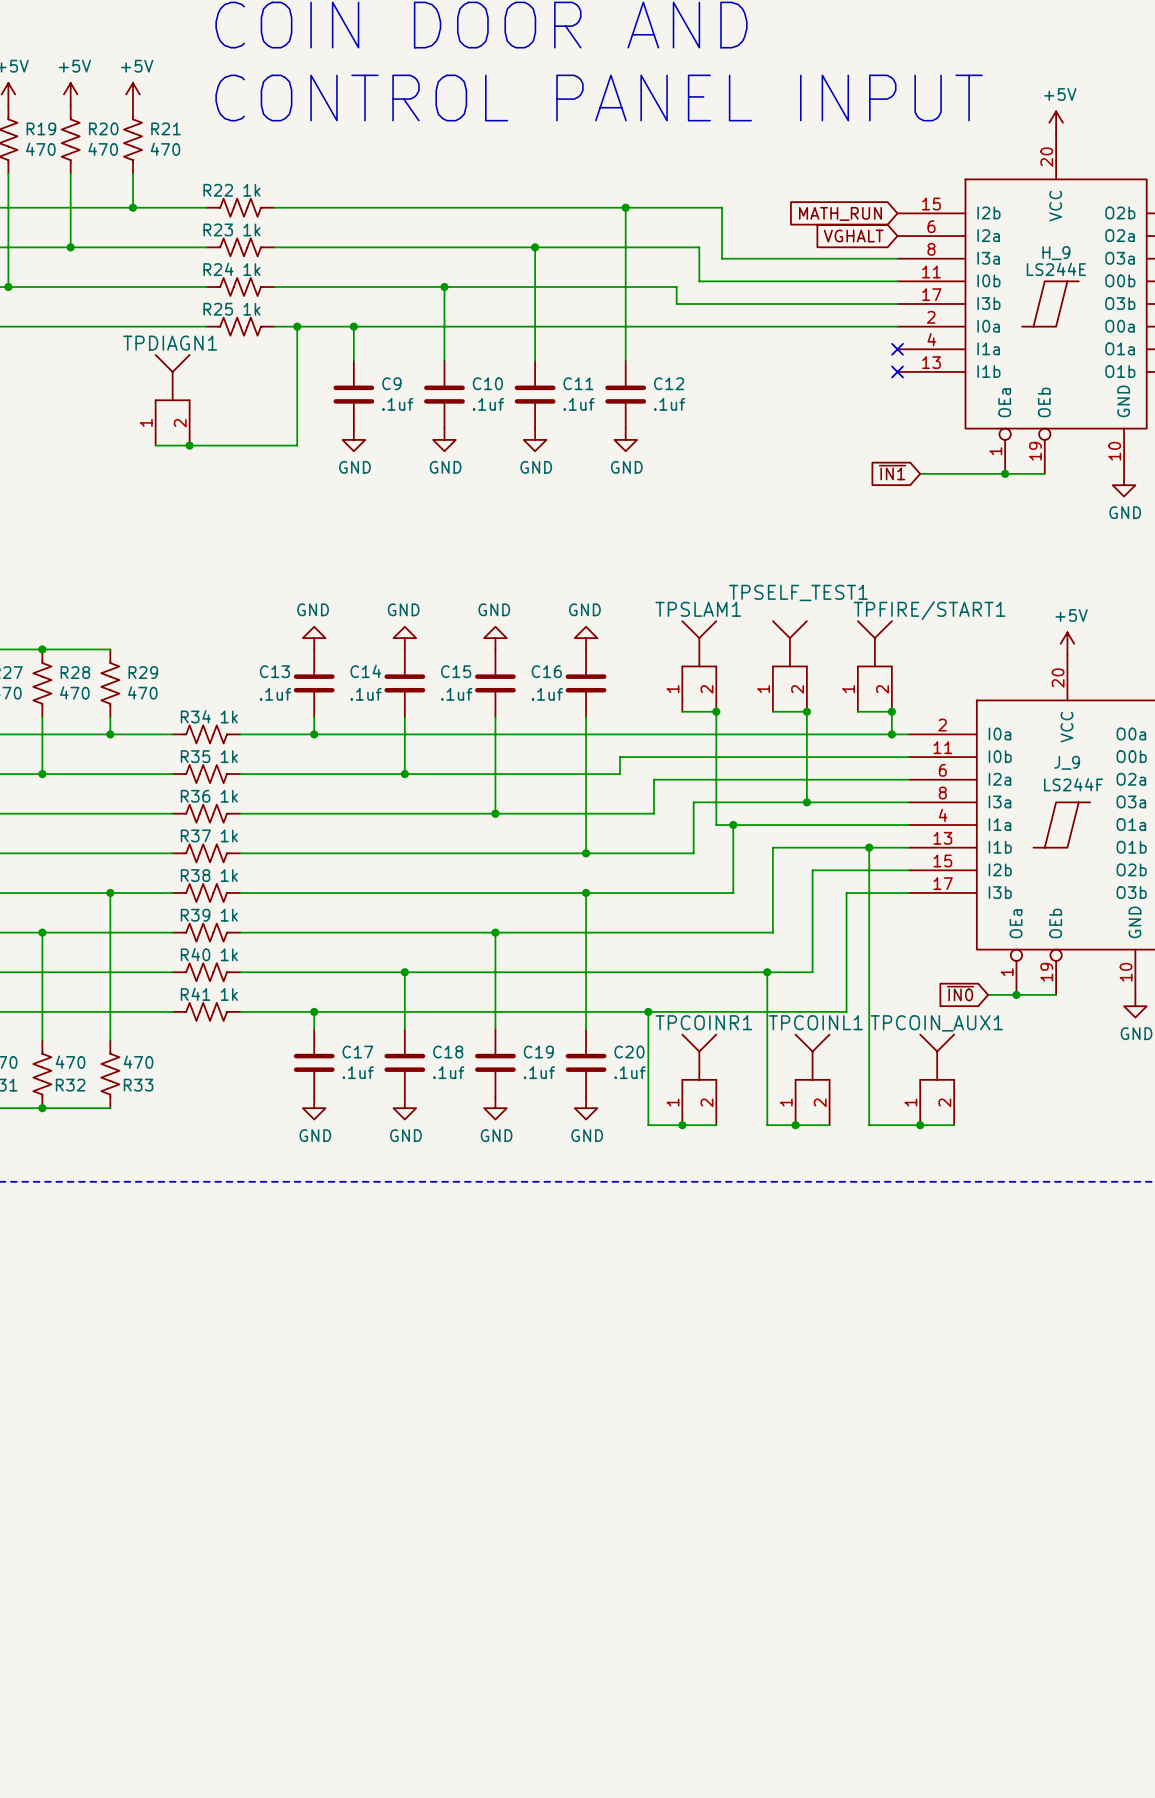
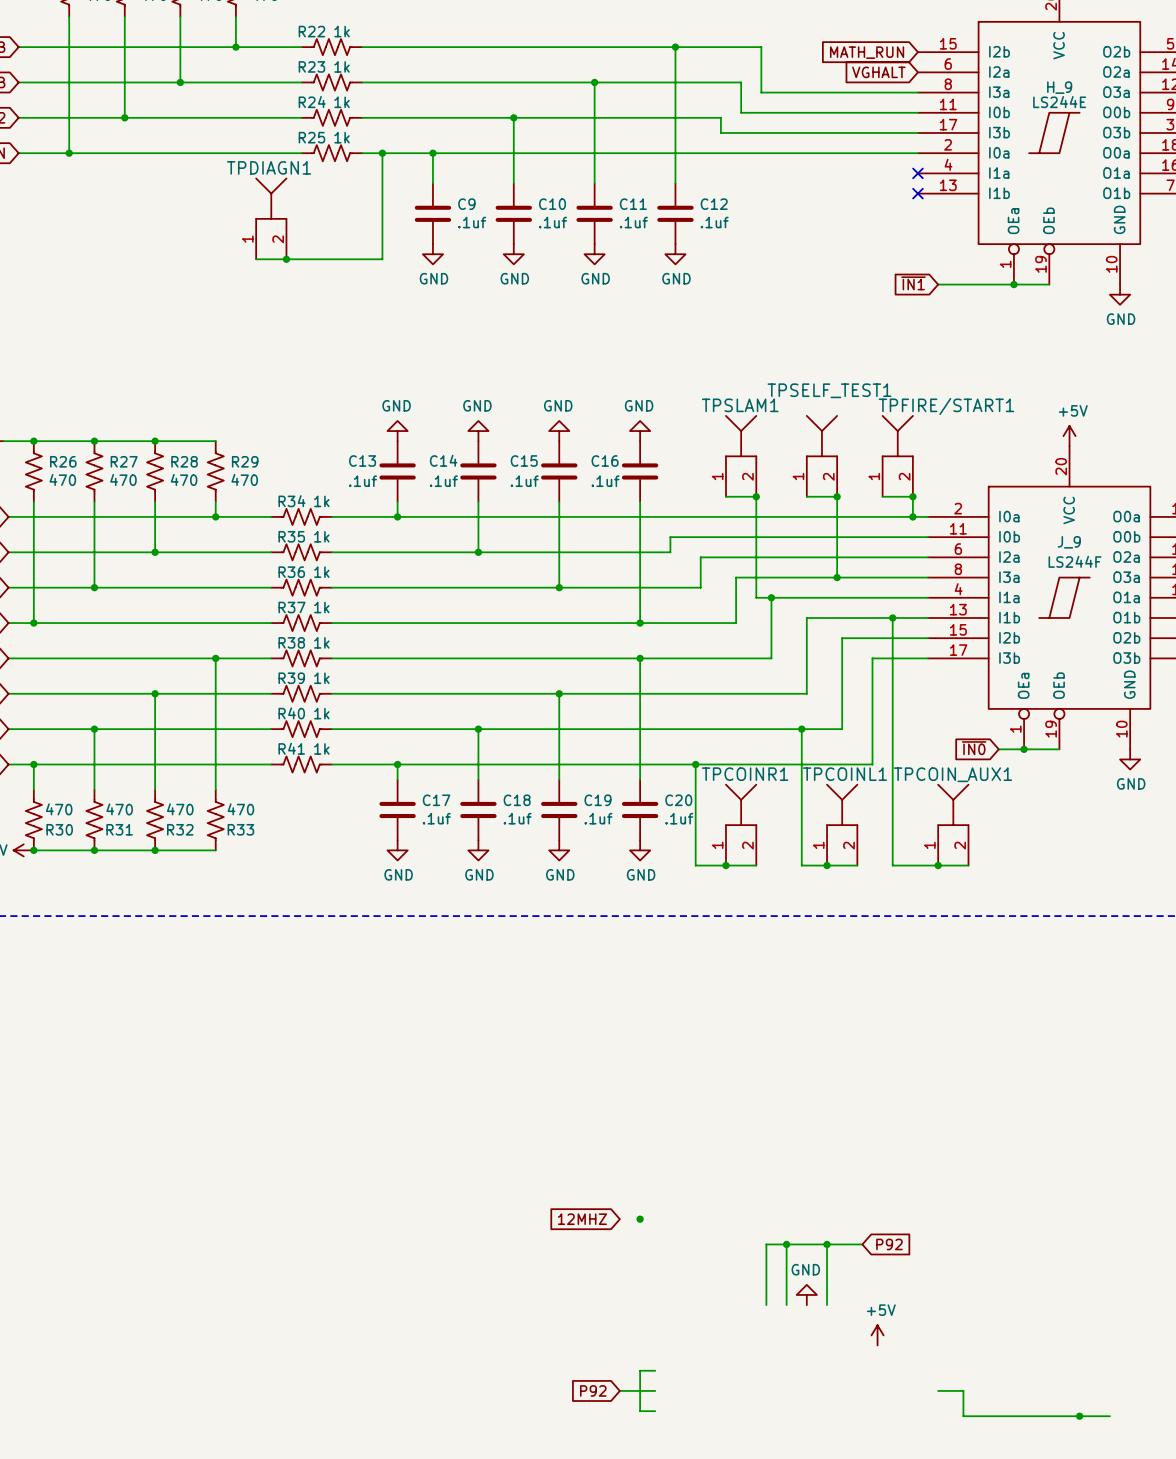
global label: none -> 12MHZ (582, 1219)
junction: none -> (640, 1219)
wire: none -> (786, 1244) (786, 1305)
junction: none -> (786, 1244)
wire: none -> (827, 1244) (827, 1305)
junction: none -> (827, 1244)
wire: none -> (862, 1244) (766, 1244) (766, 1305)
global label: none -> P92 (889, 1244)
power symbol: none -> GND (806, 1294)
power symbol: none -> +5V (877, 1335)
wire: none -> (655, 1370) (640, 1370) (640, 1411) (655, 1411)
global label: none -> P92 (593, 1390)
wire: none -> (619, 1390) (655, 1390)
wire: none -> (938, 1390) (963, 1390) (963, 1416) (1109, 1416)
junction: none -> (1079, 1416)

